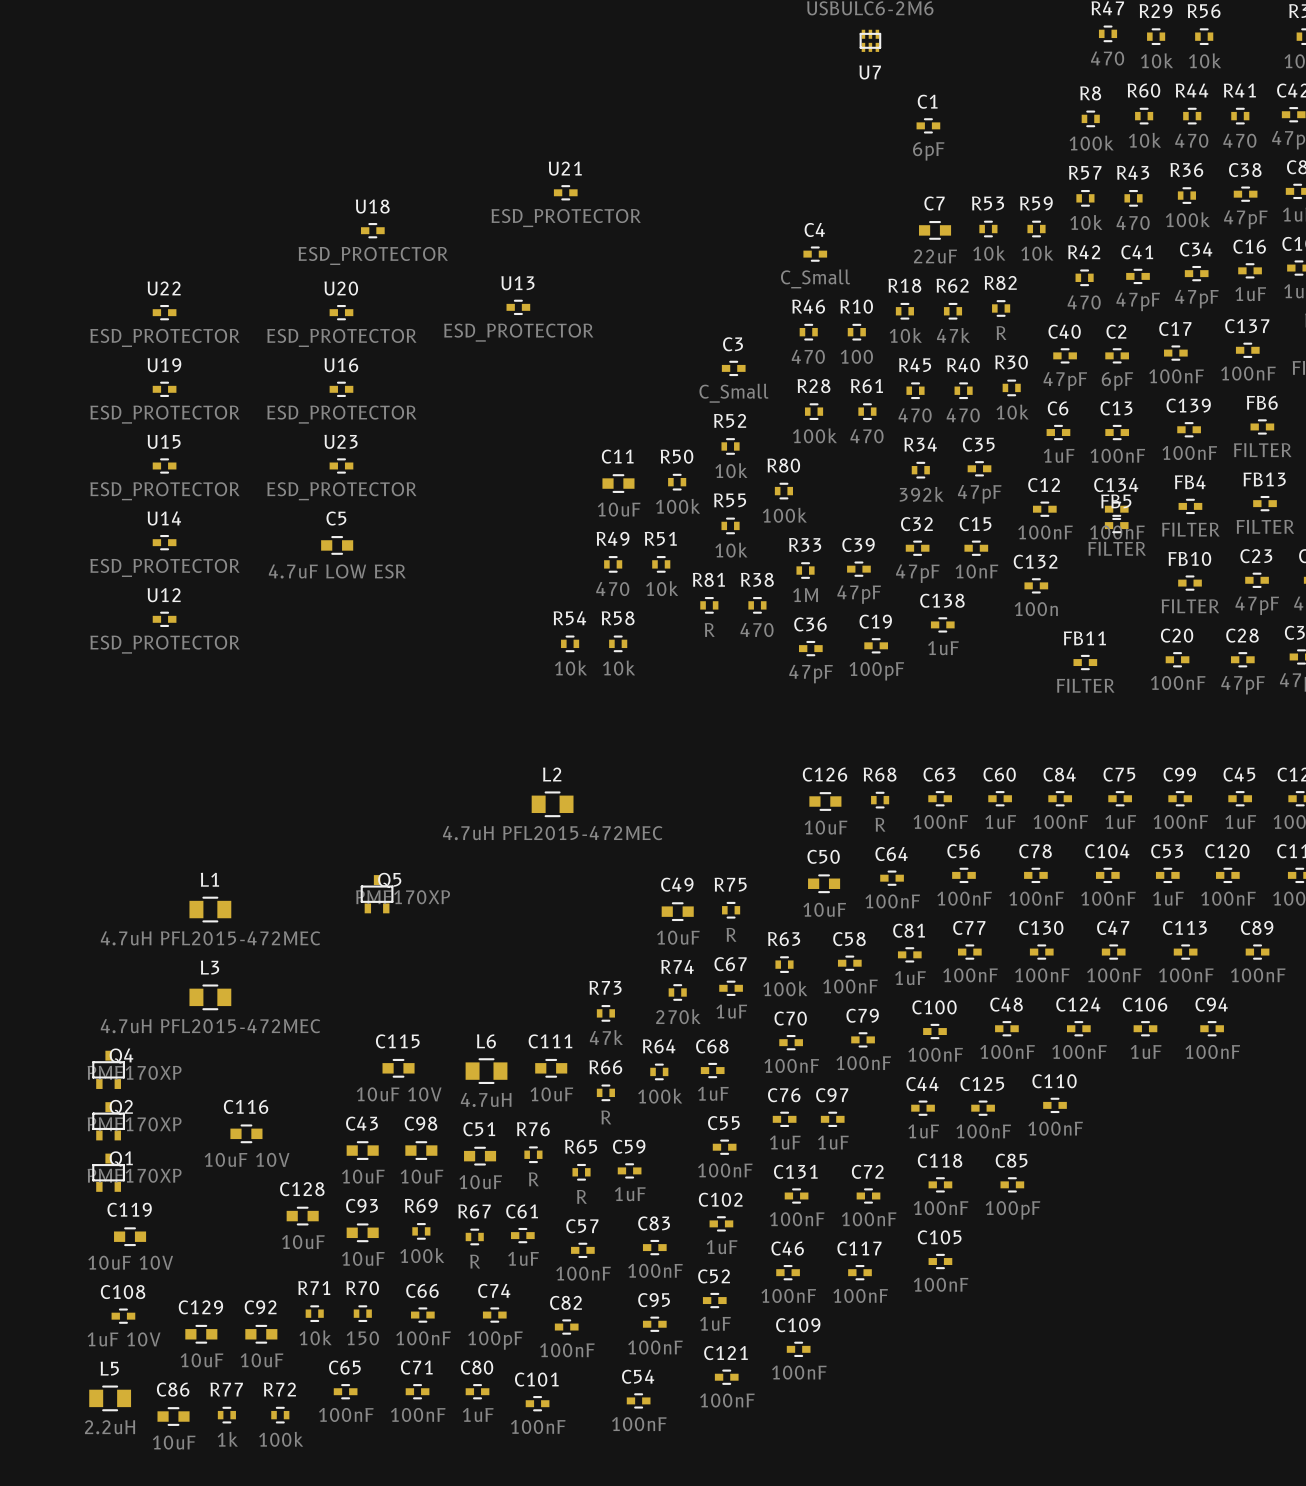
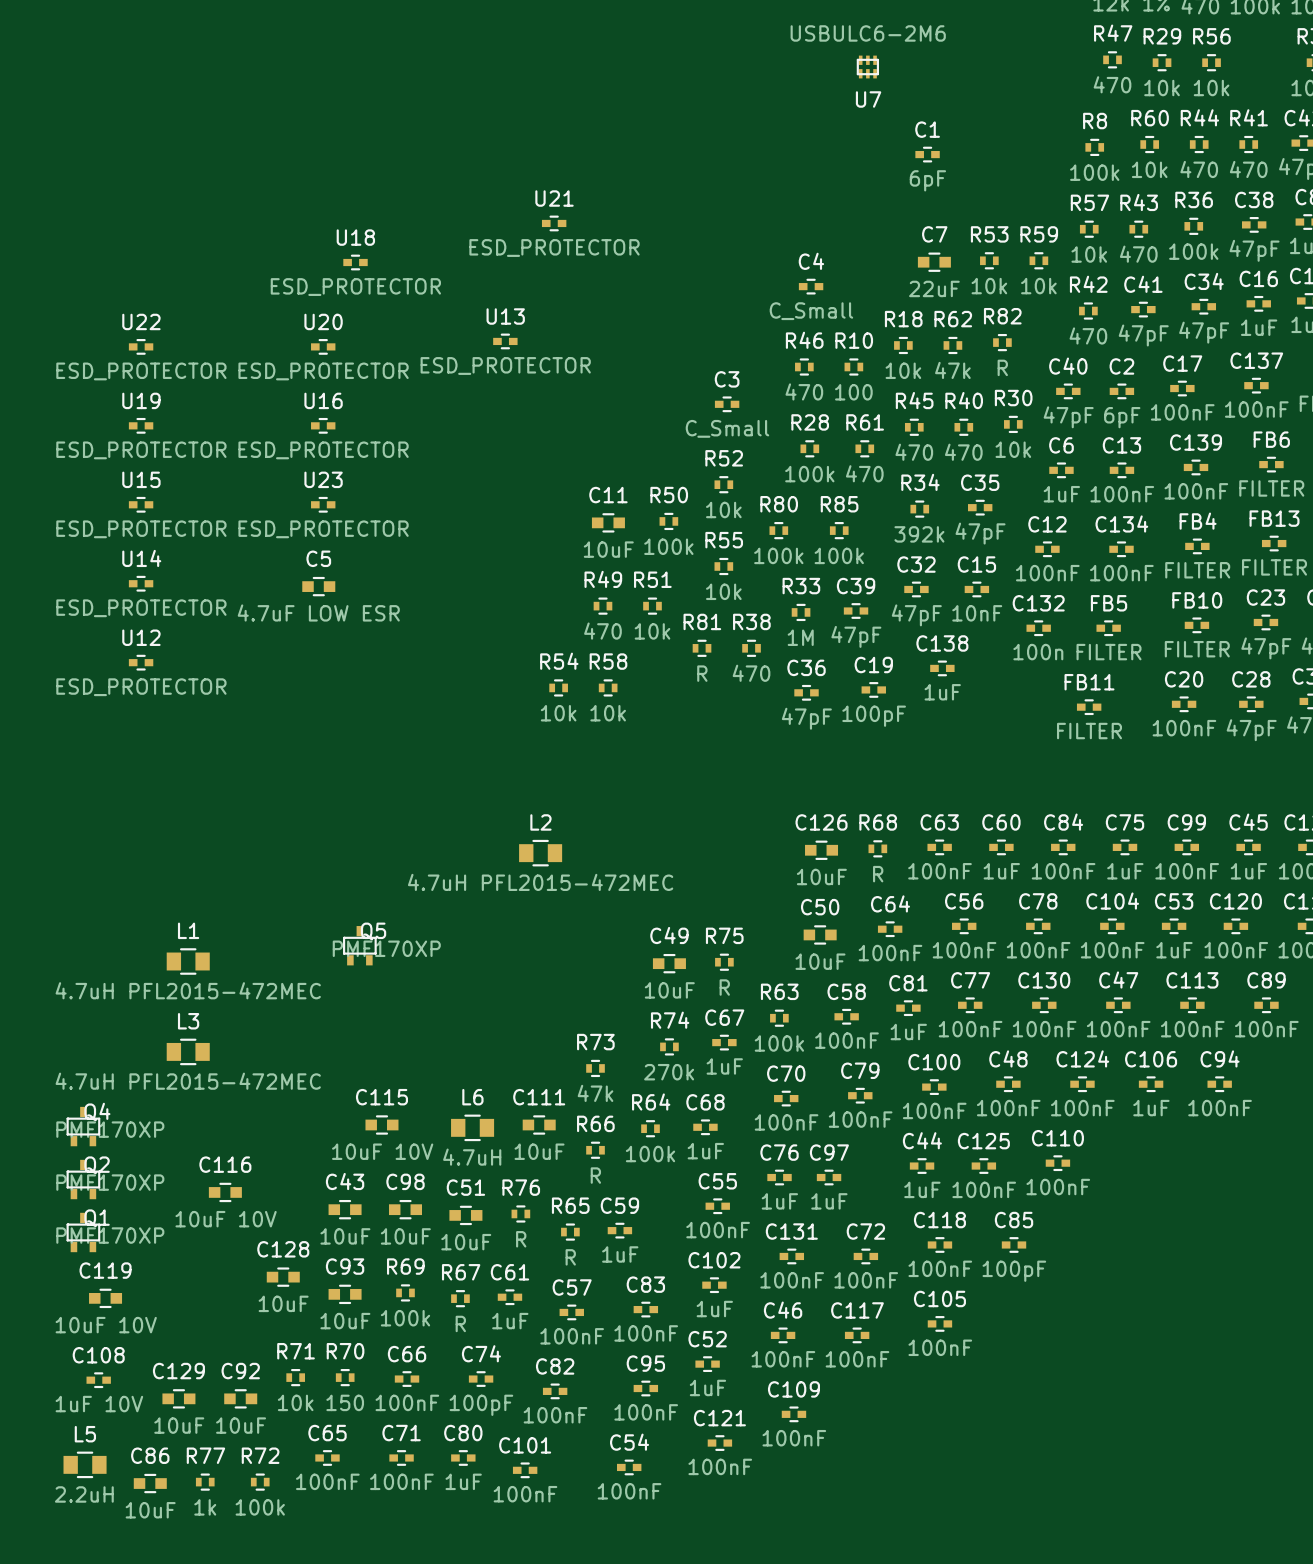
R85: none -> 100k (839, 530)
FB5 position: (1116, 525) -> (1108, 628)

